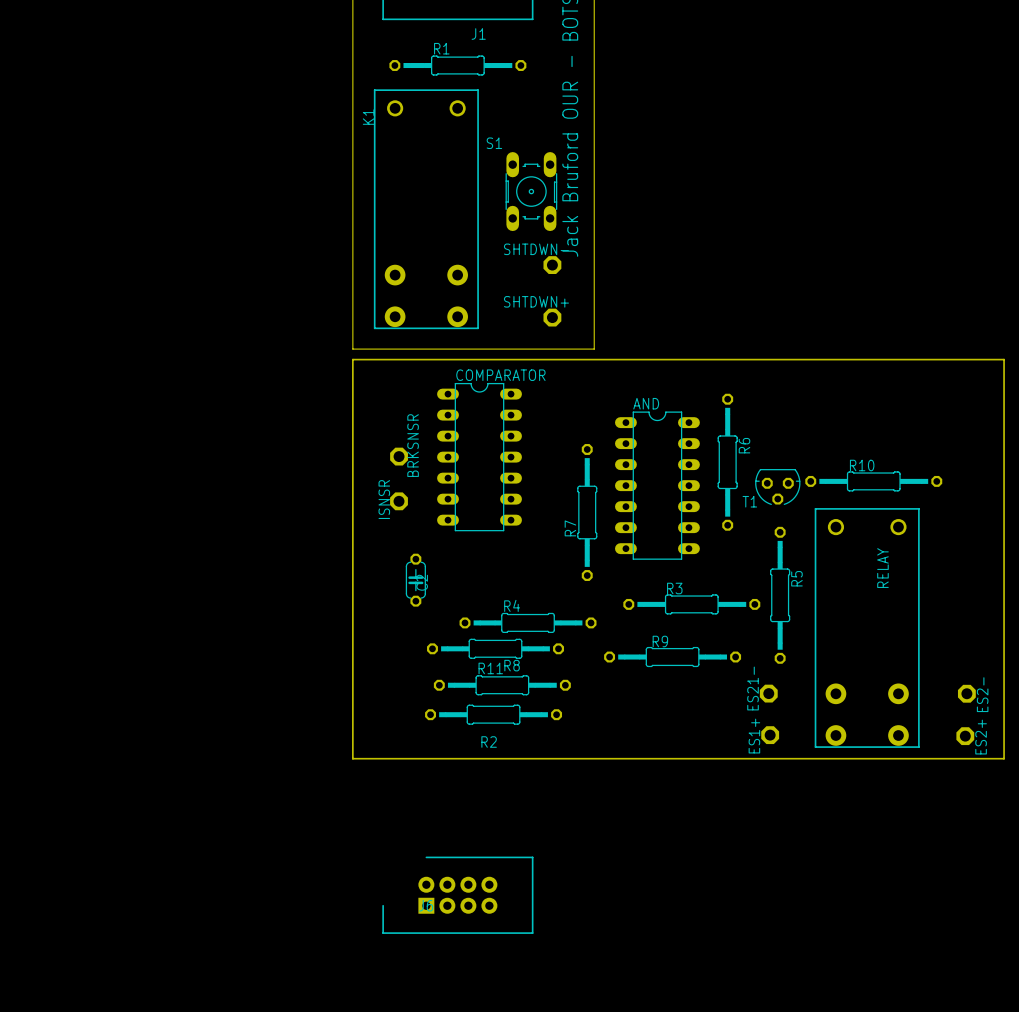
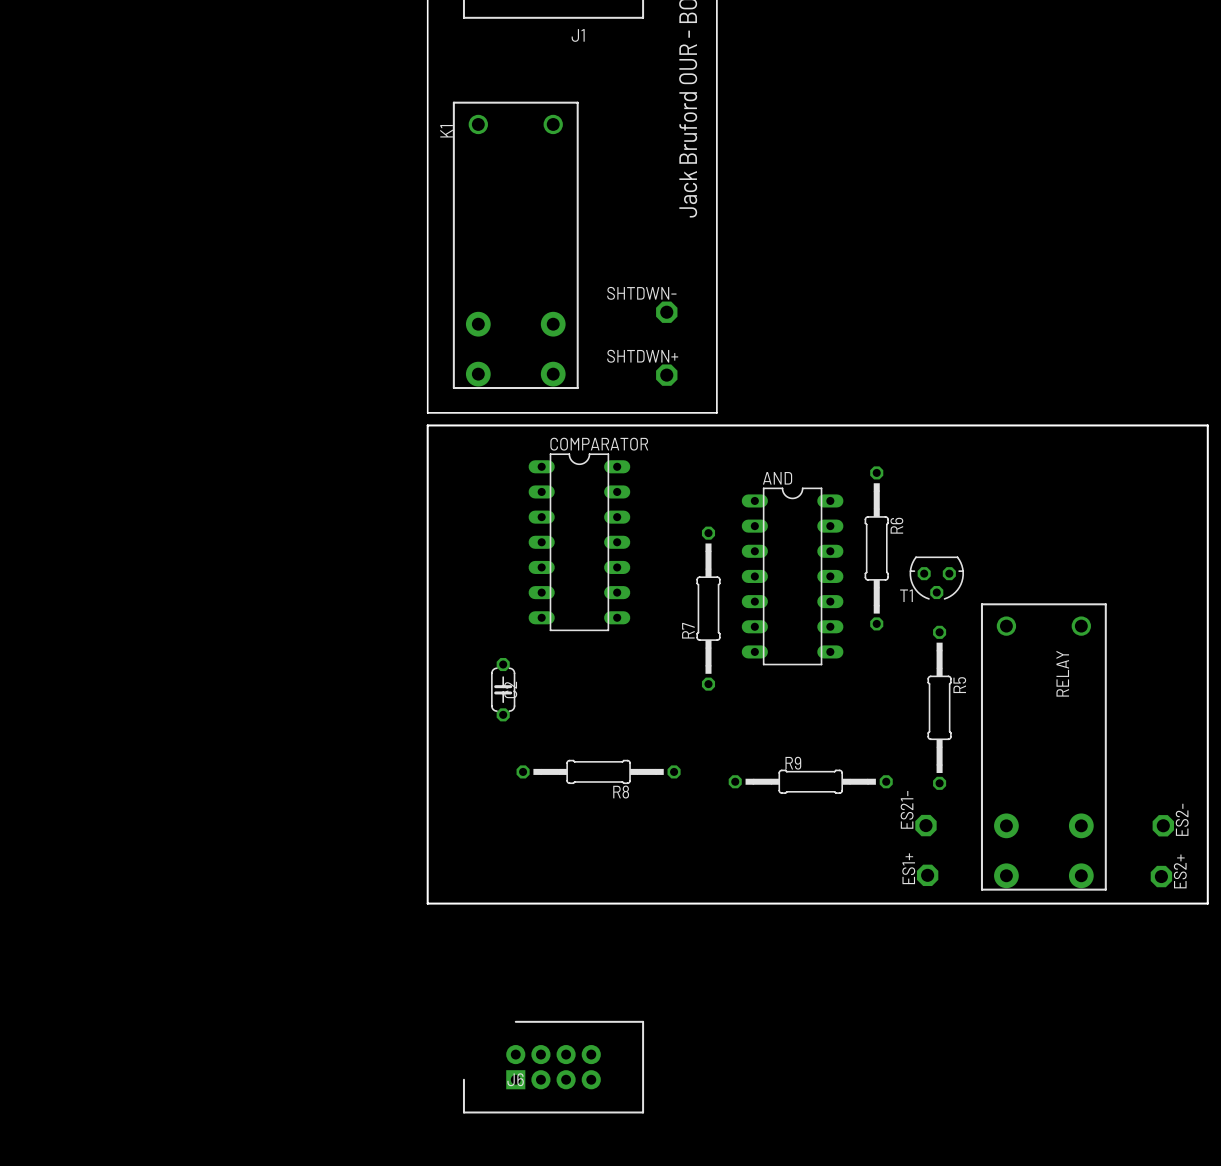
R1: (457, 65) -> none
S1: (531, 191) -> none
BRKSNSR: (399, 456) -> none
R10: (873, 481) -> none
ISNSR: (399, 501) -> none
R3: (691, 604) -> none
R4: (528, 622) -> none
R11: (502, 685) -> none
R2: (493, 714) -> none

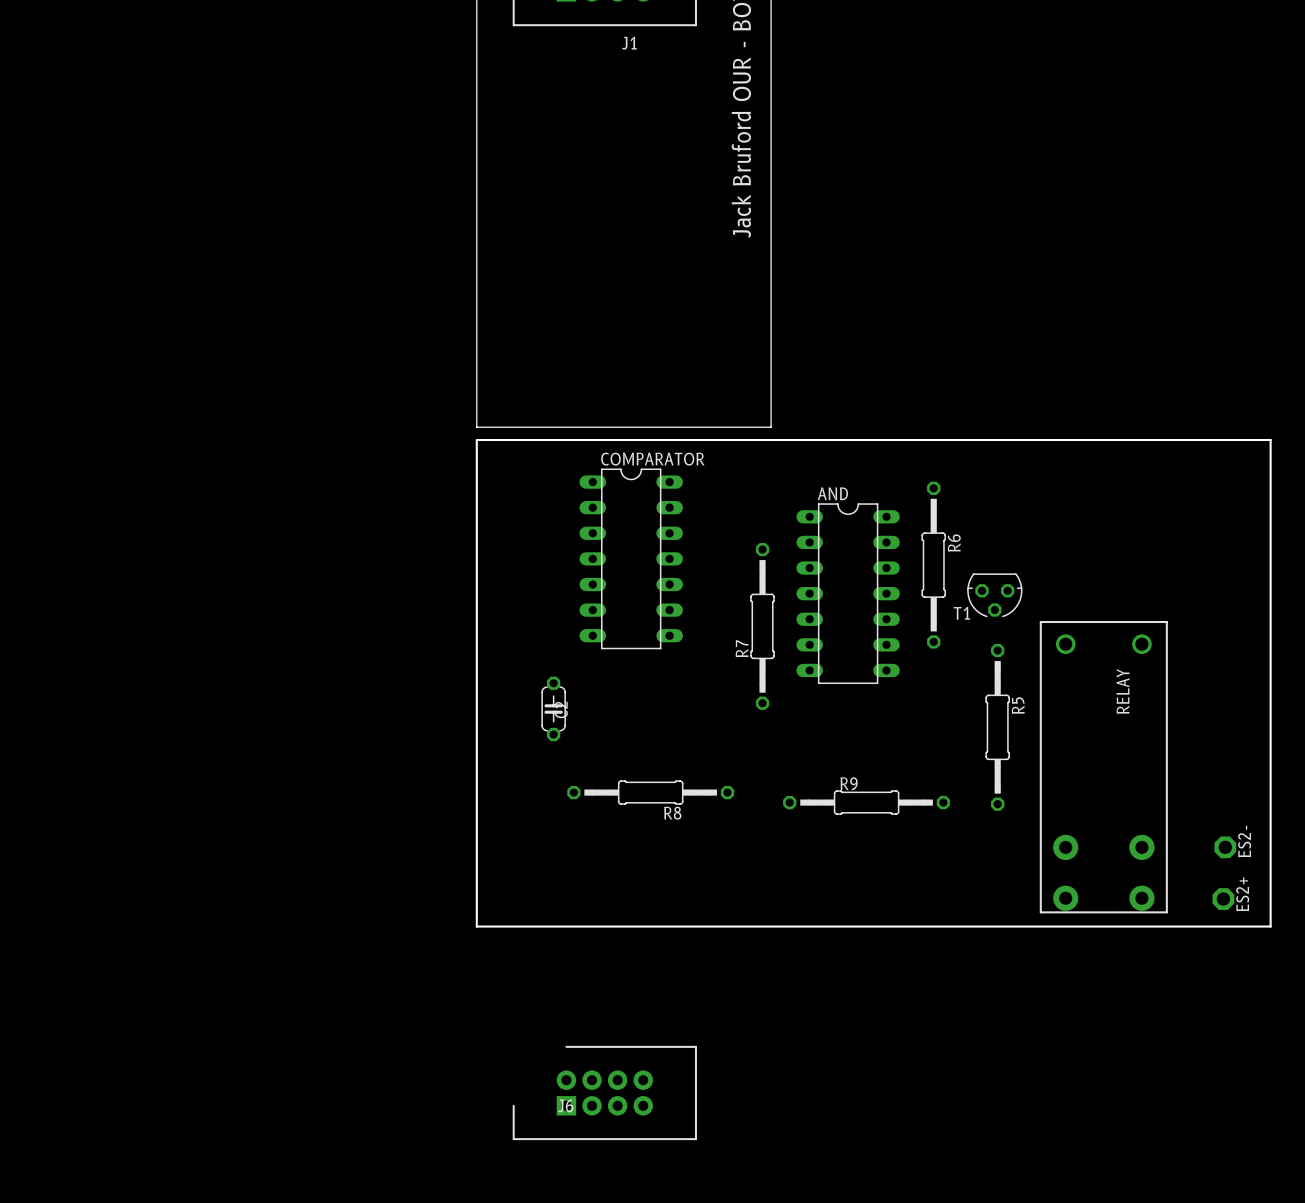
K1: (515, 245) -> none
SHTDWN-: (666, 312) -> none
SHTDWN+: (666, 375) -> none
ES21-: (925, 825) -> none
ES1+: (927, 875) -> none

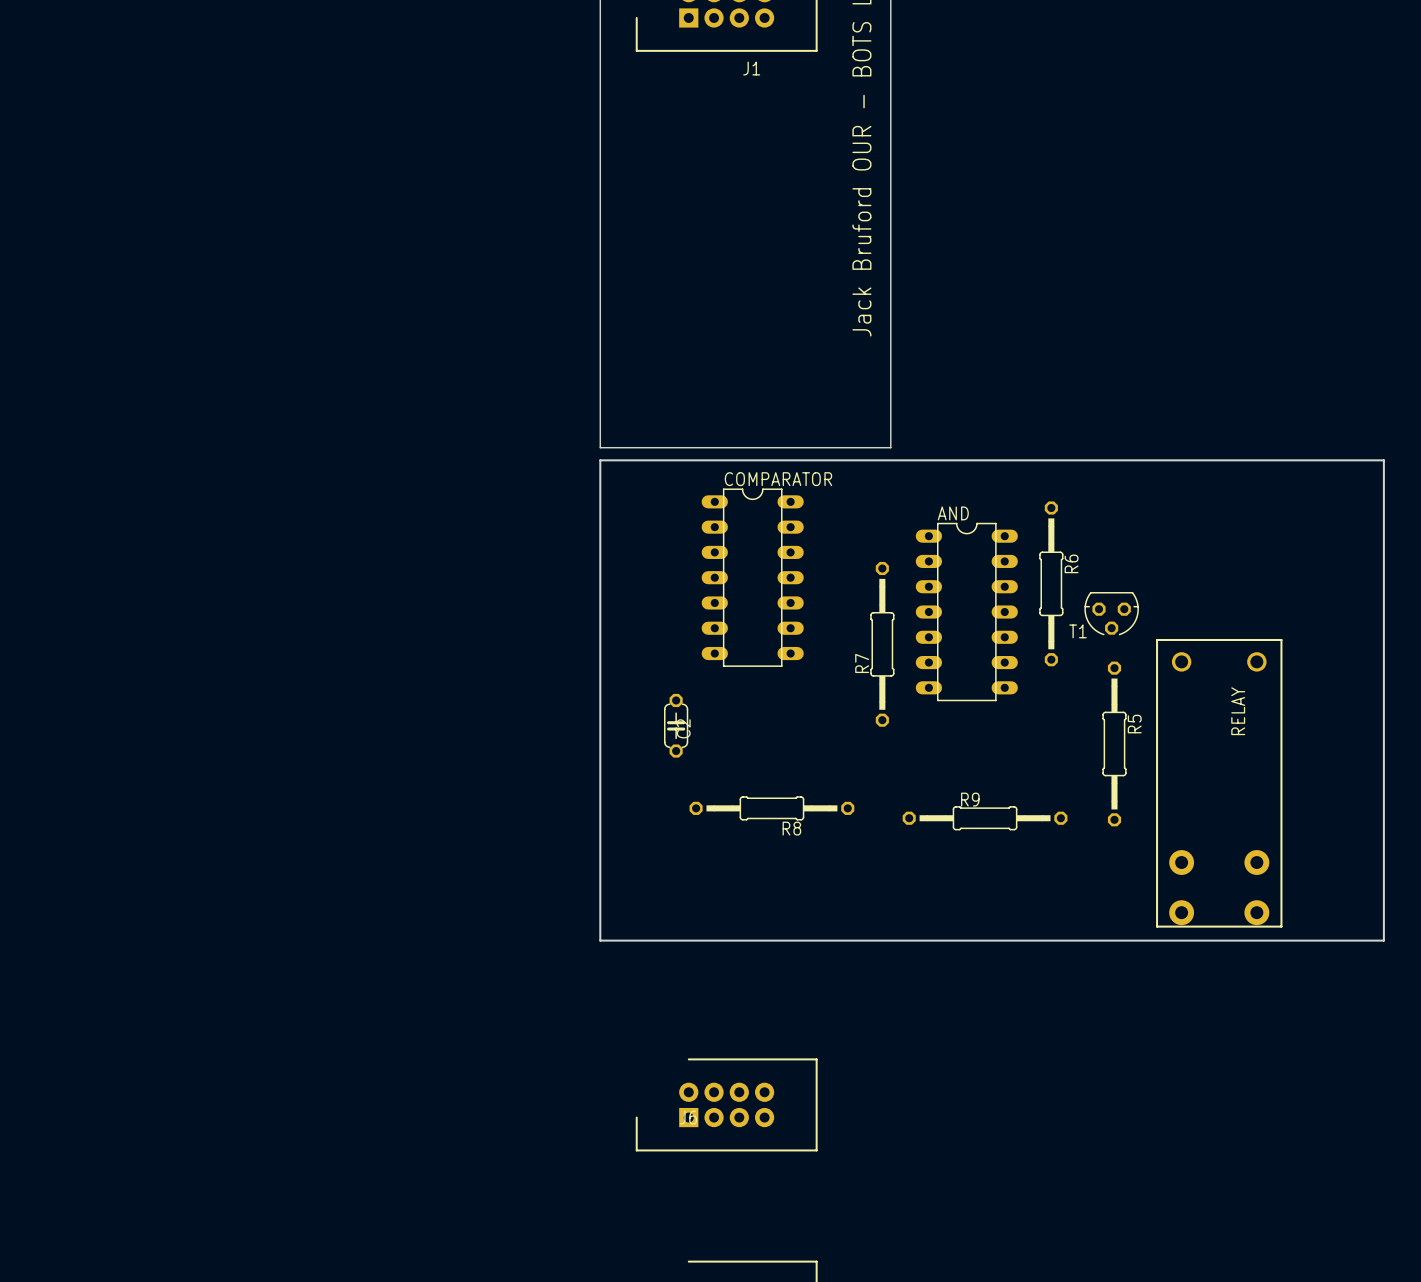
ES2-: (1225, 847) -> none
ES2+: (1223, 899) -> none

